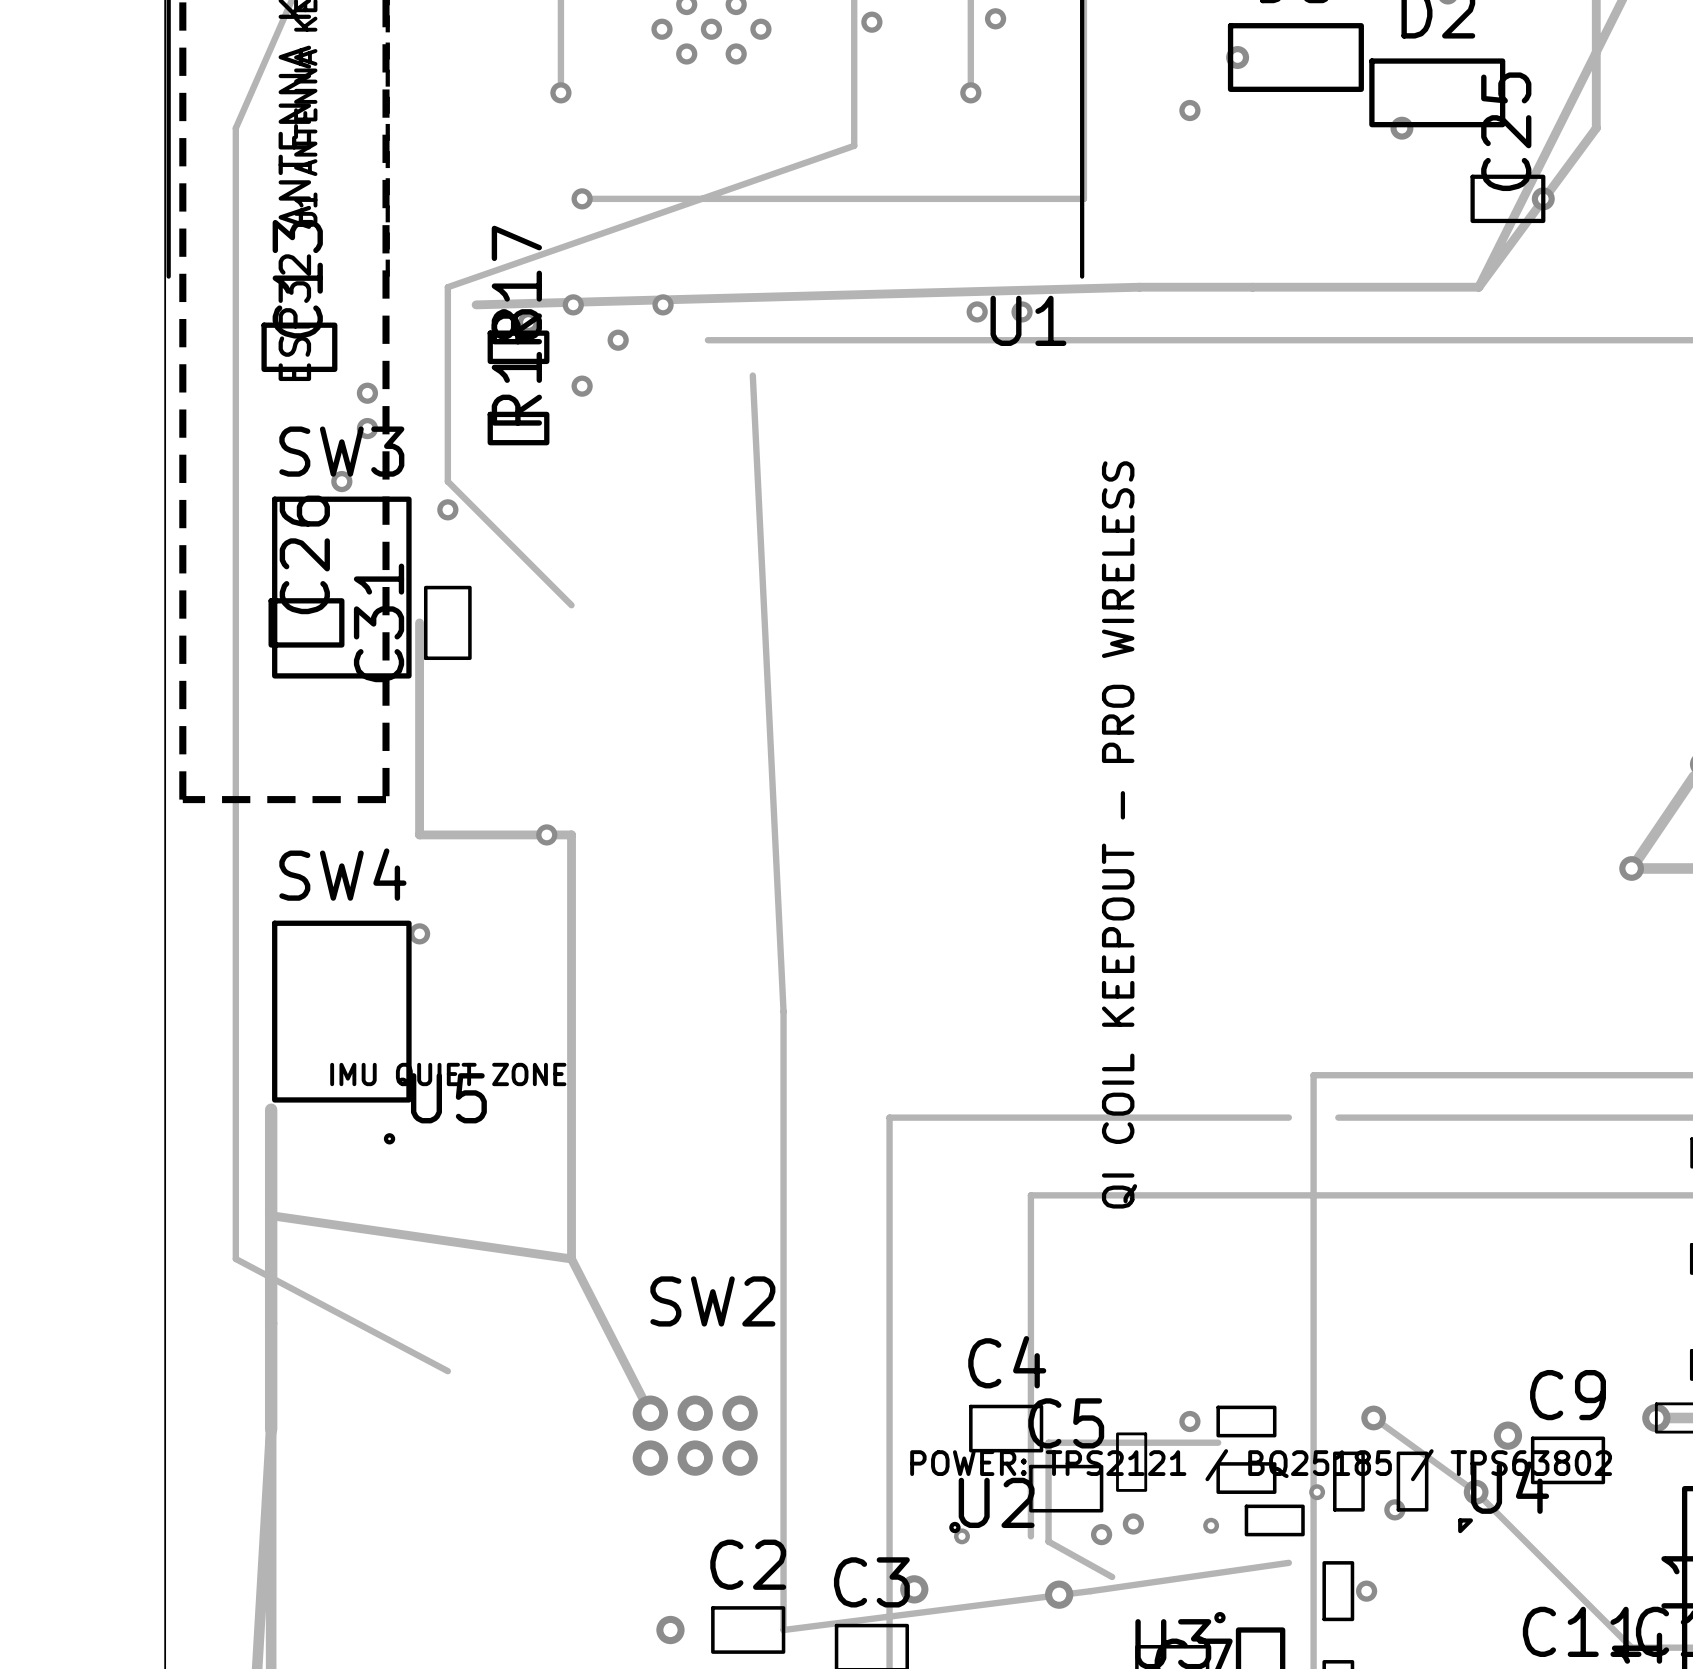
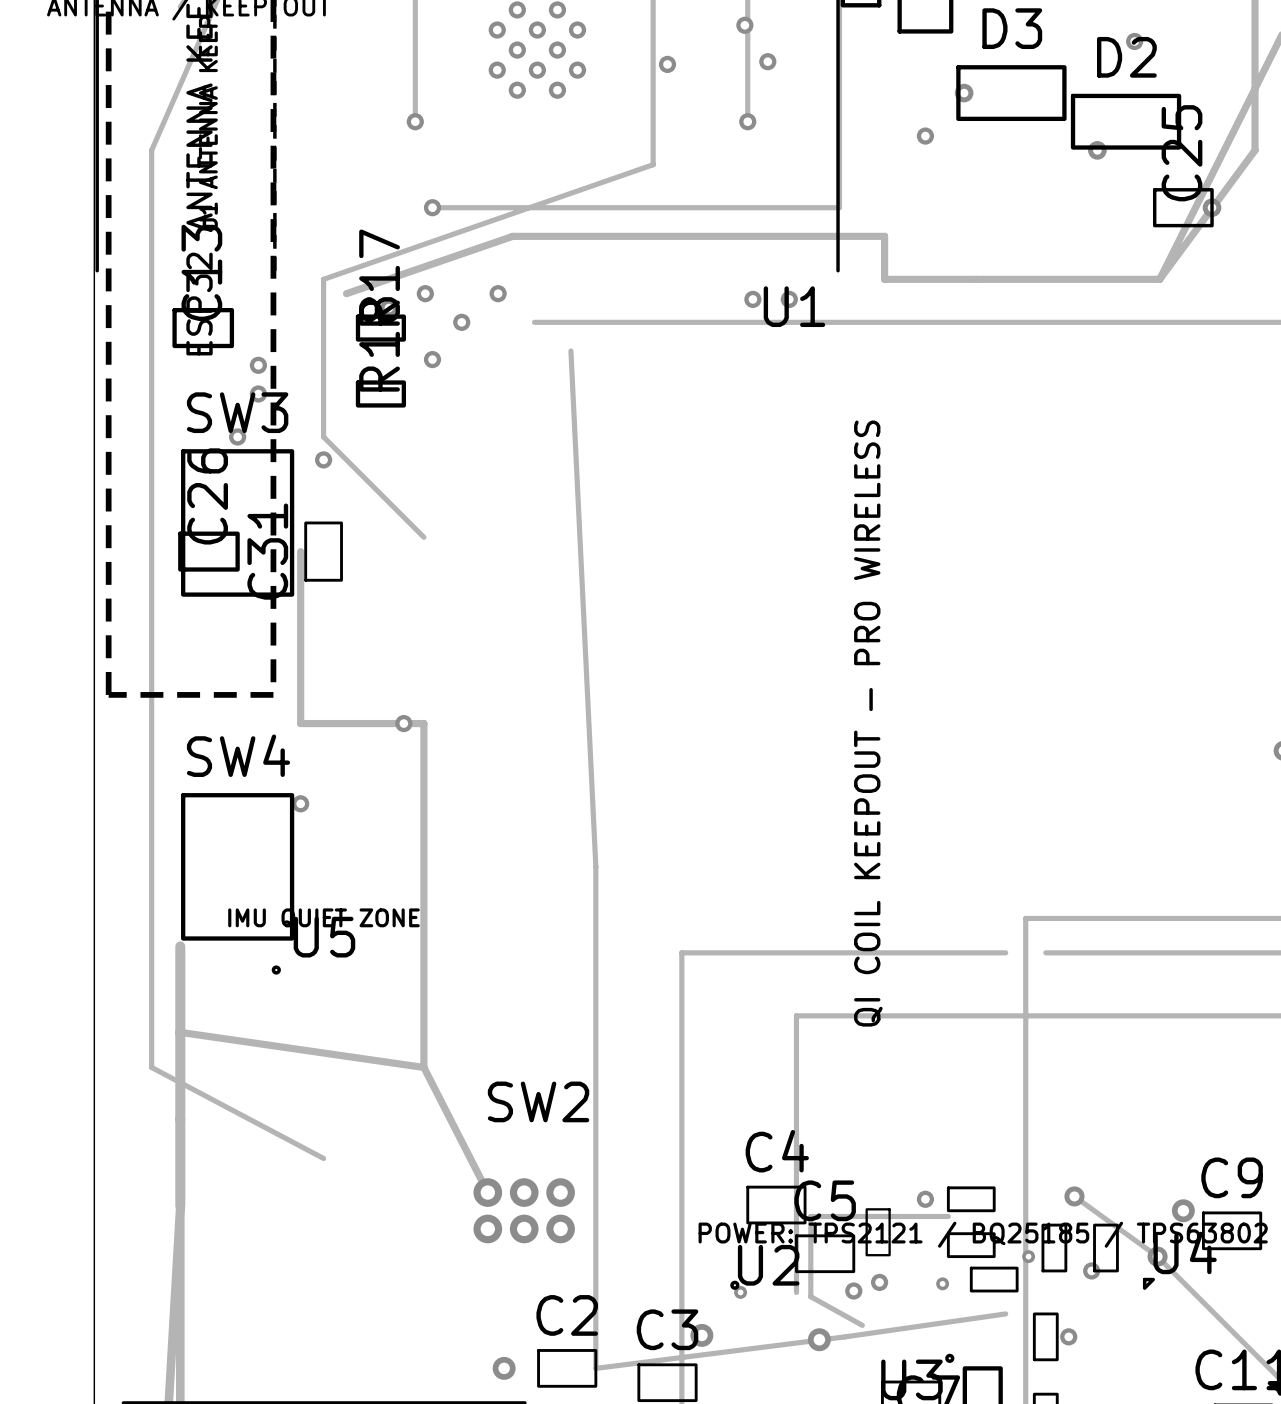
track: (1139, 287) (476, 304) -> (884, 279) (884, 236) (512, 236) (346, 293)

